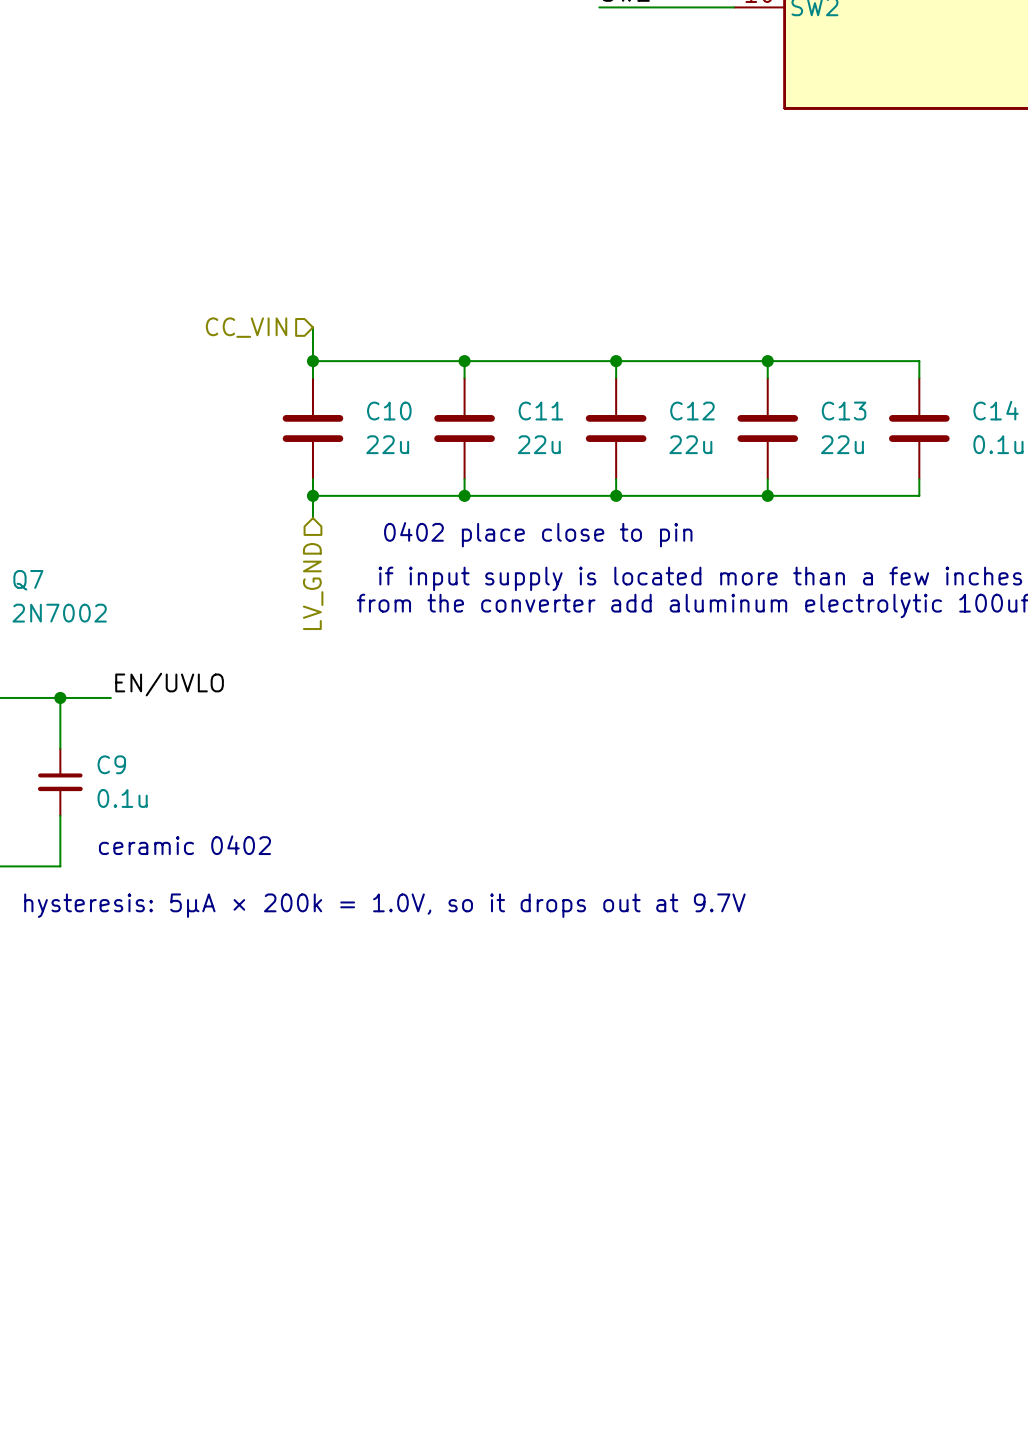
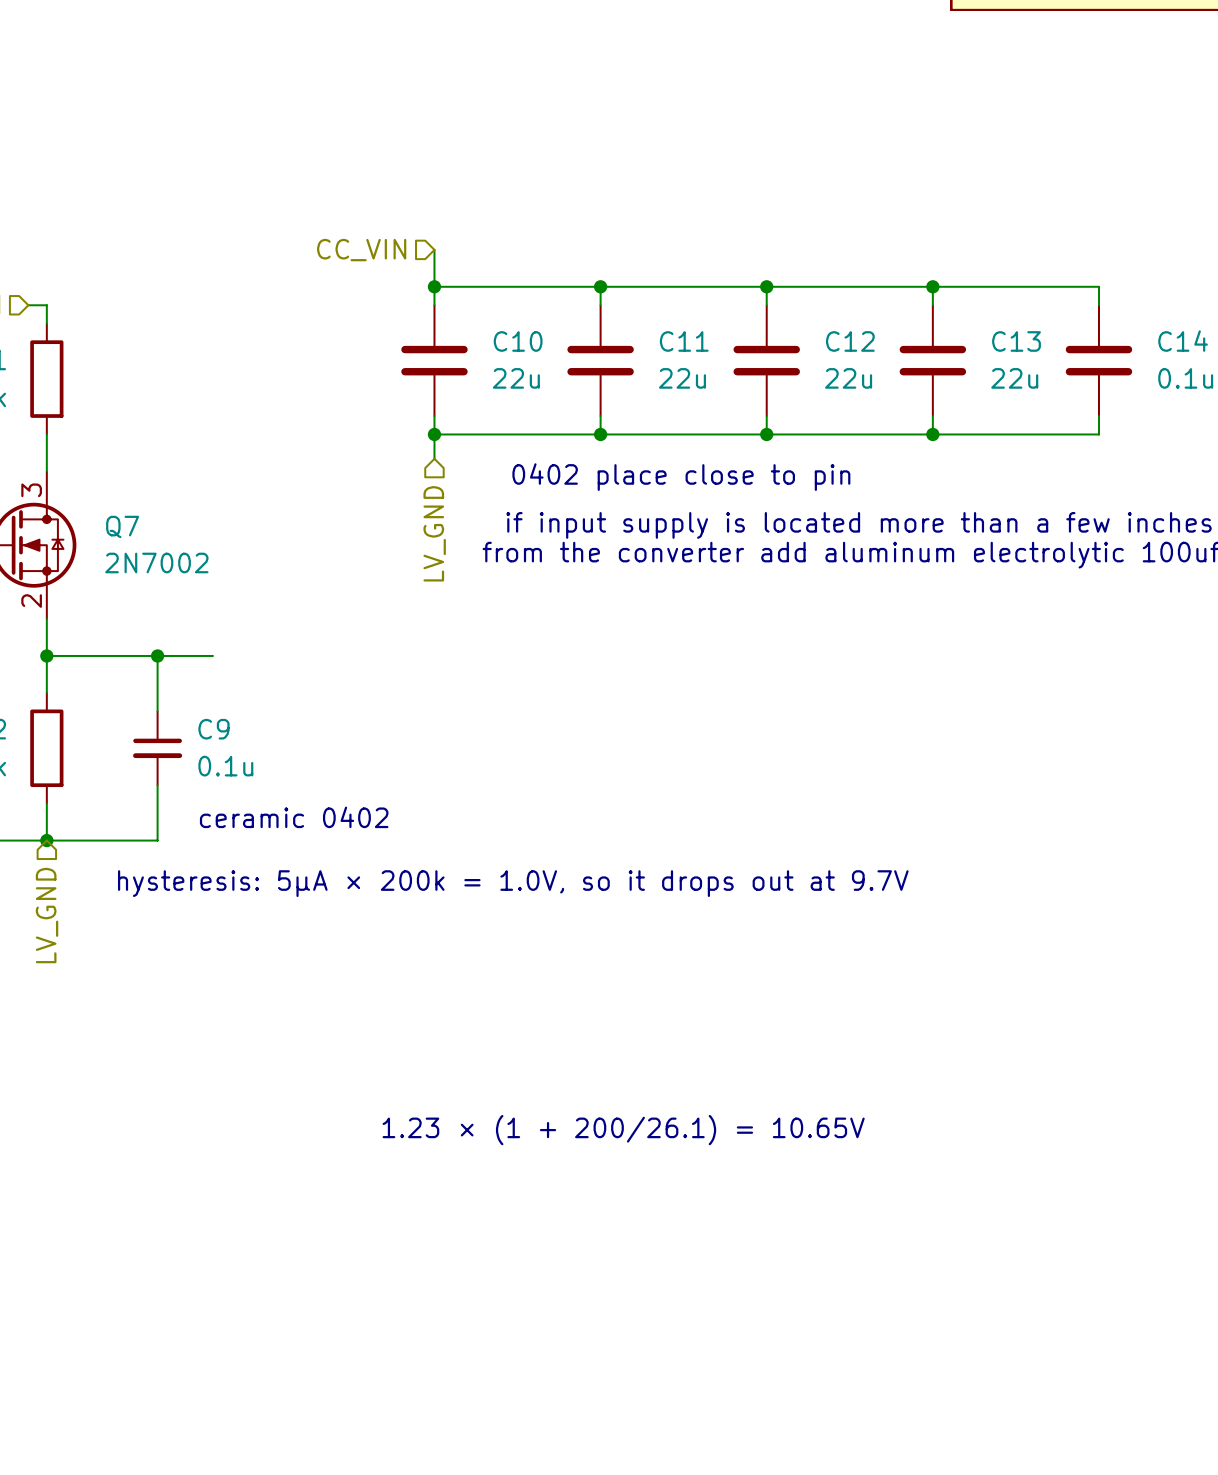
label: EN/UVLO (169, 684) -> none
text: none -> 1.23 × (1 + 200/26.1) = 10.65V (623, 1130)

